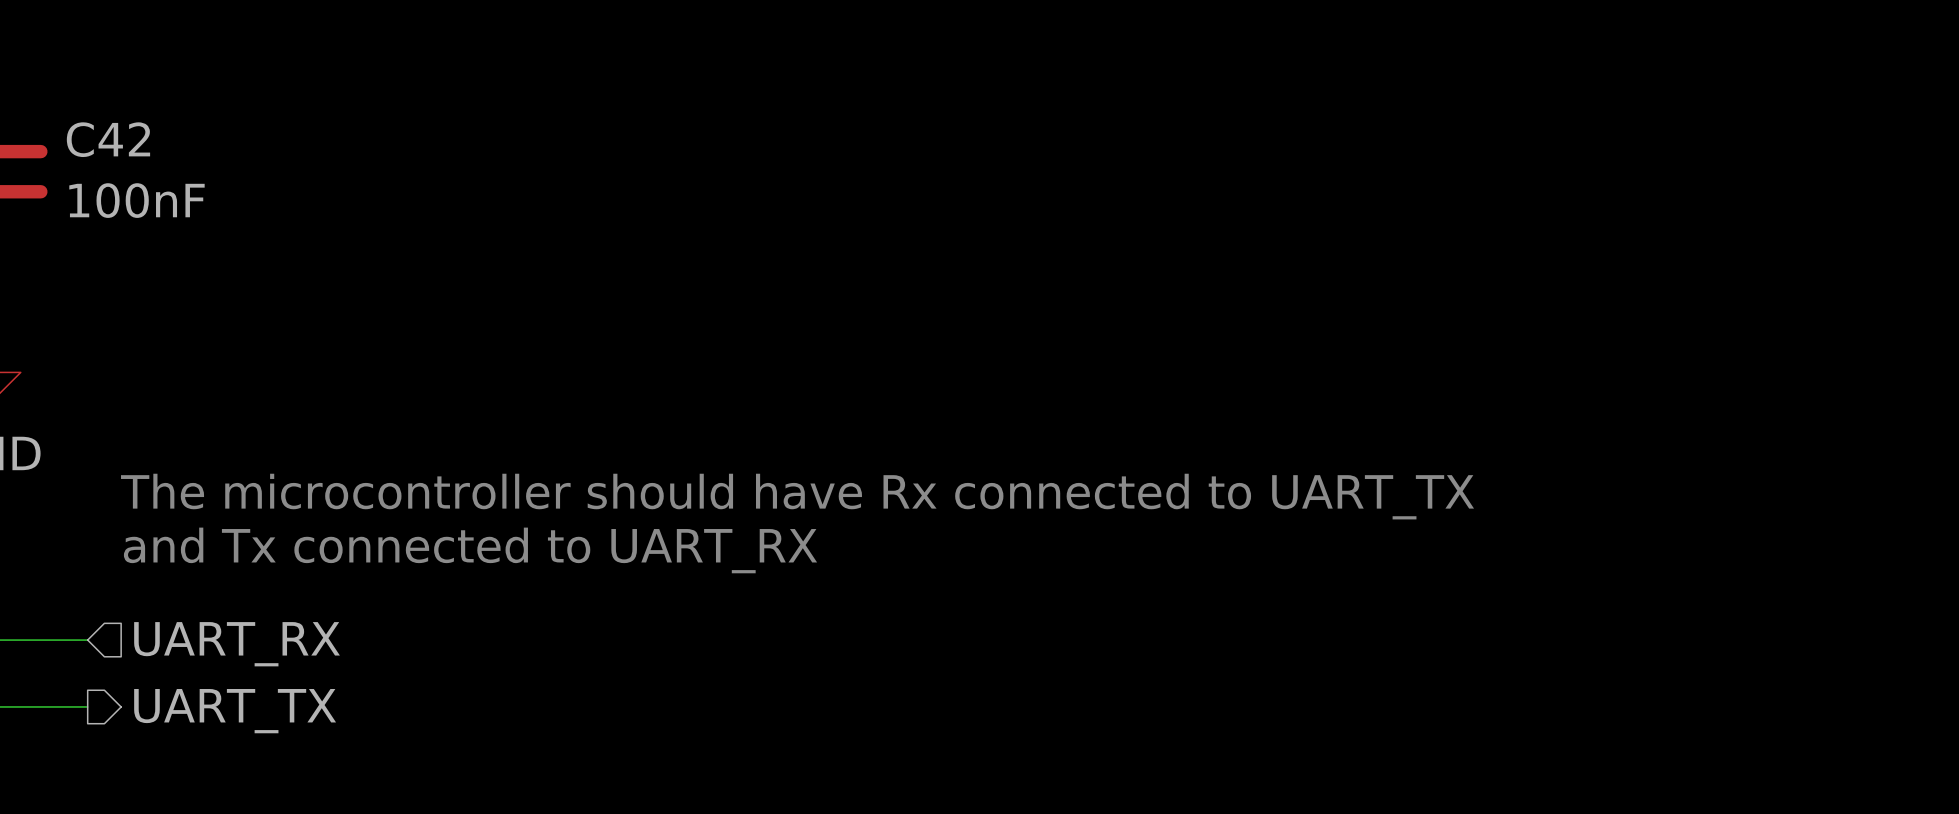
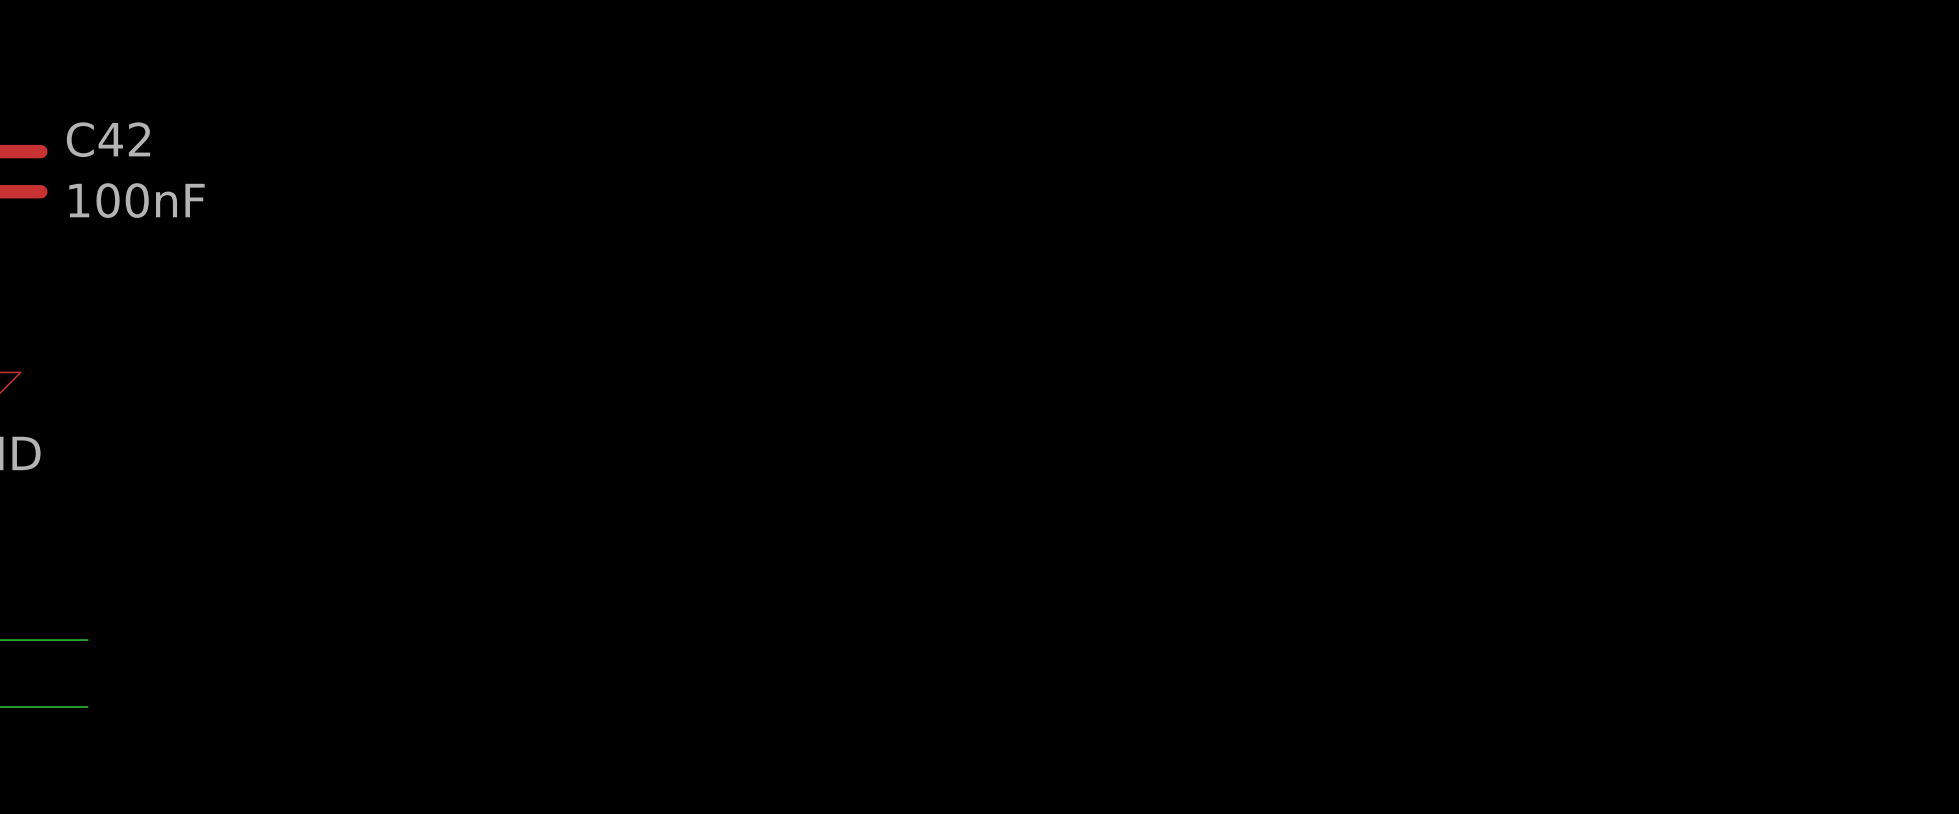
text: The microcontroller should have Rx connected to UART_TX (797, 496) -> none
text: and Tx connected to UART_RX (470, 550) -> none
hierarchical label: UART_RX (237, 644) -> none
hierarchical label: UART_TX (235, 711) -> none

